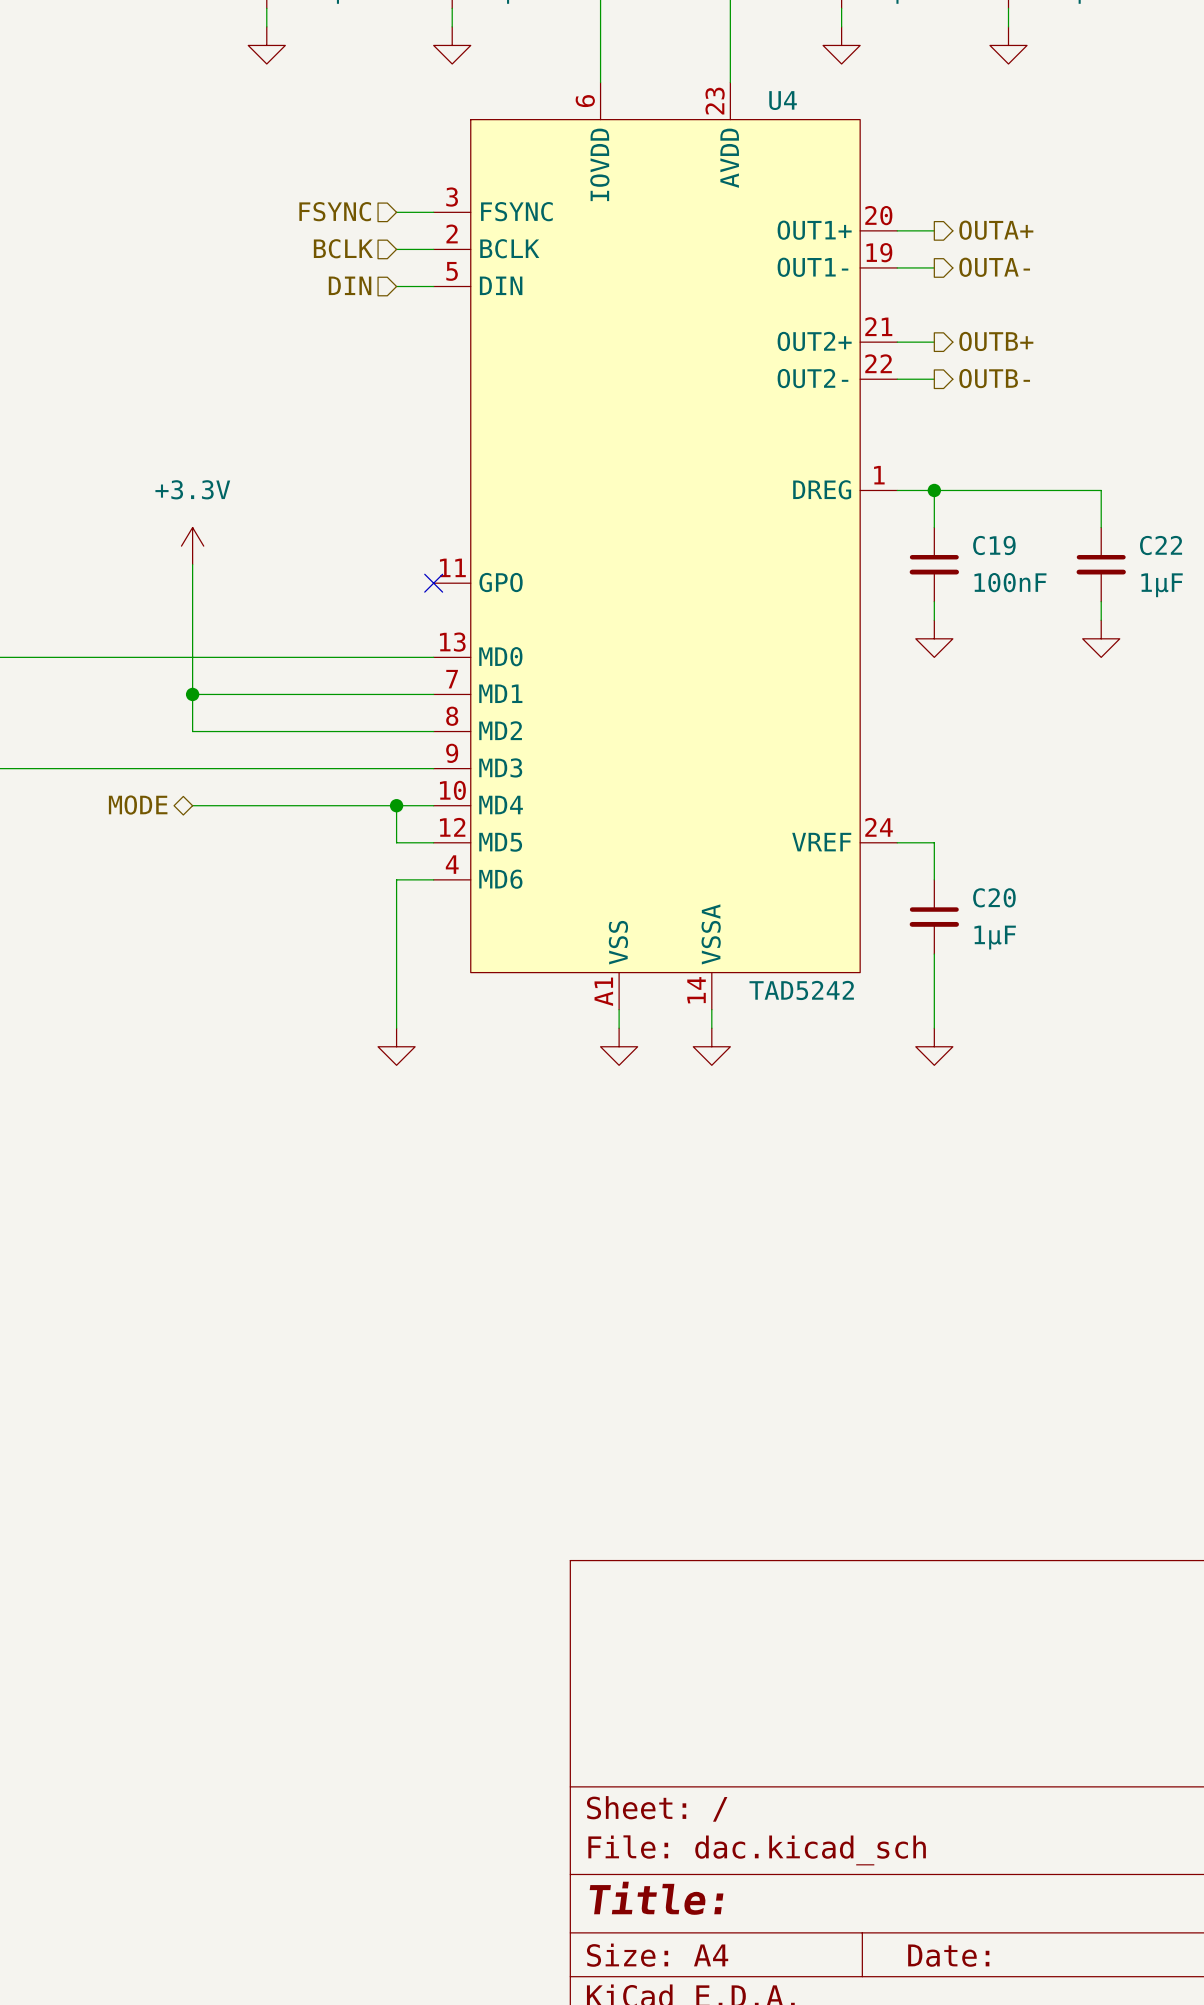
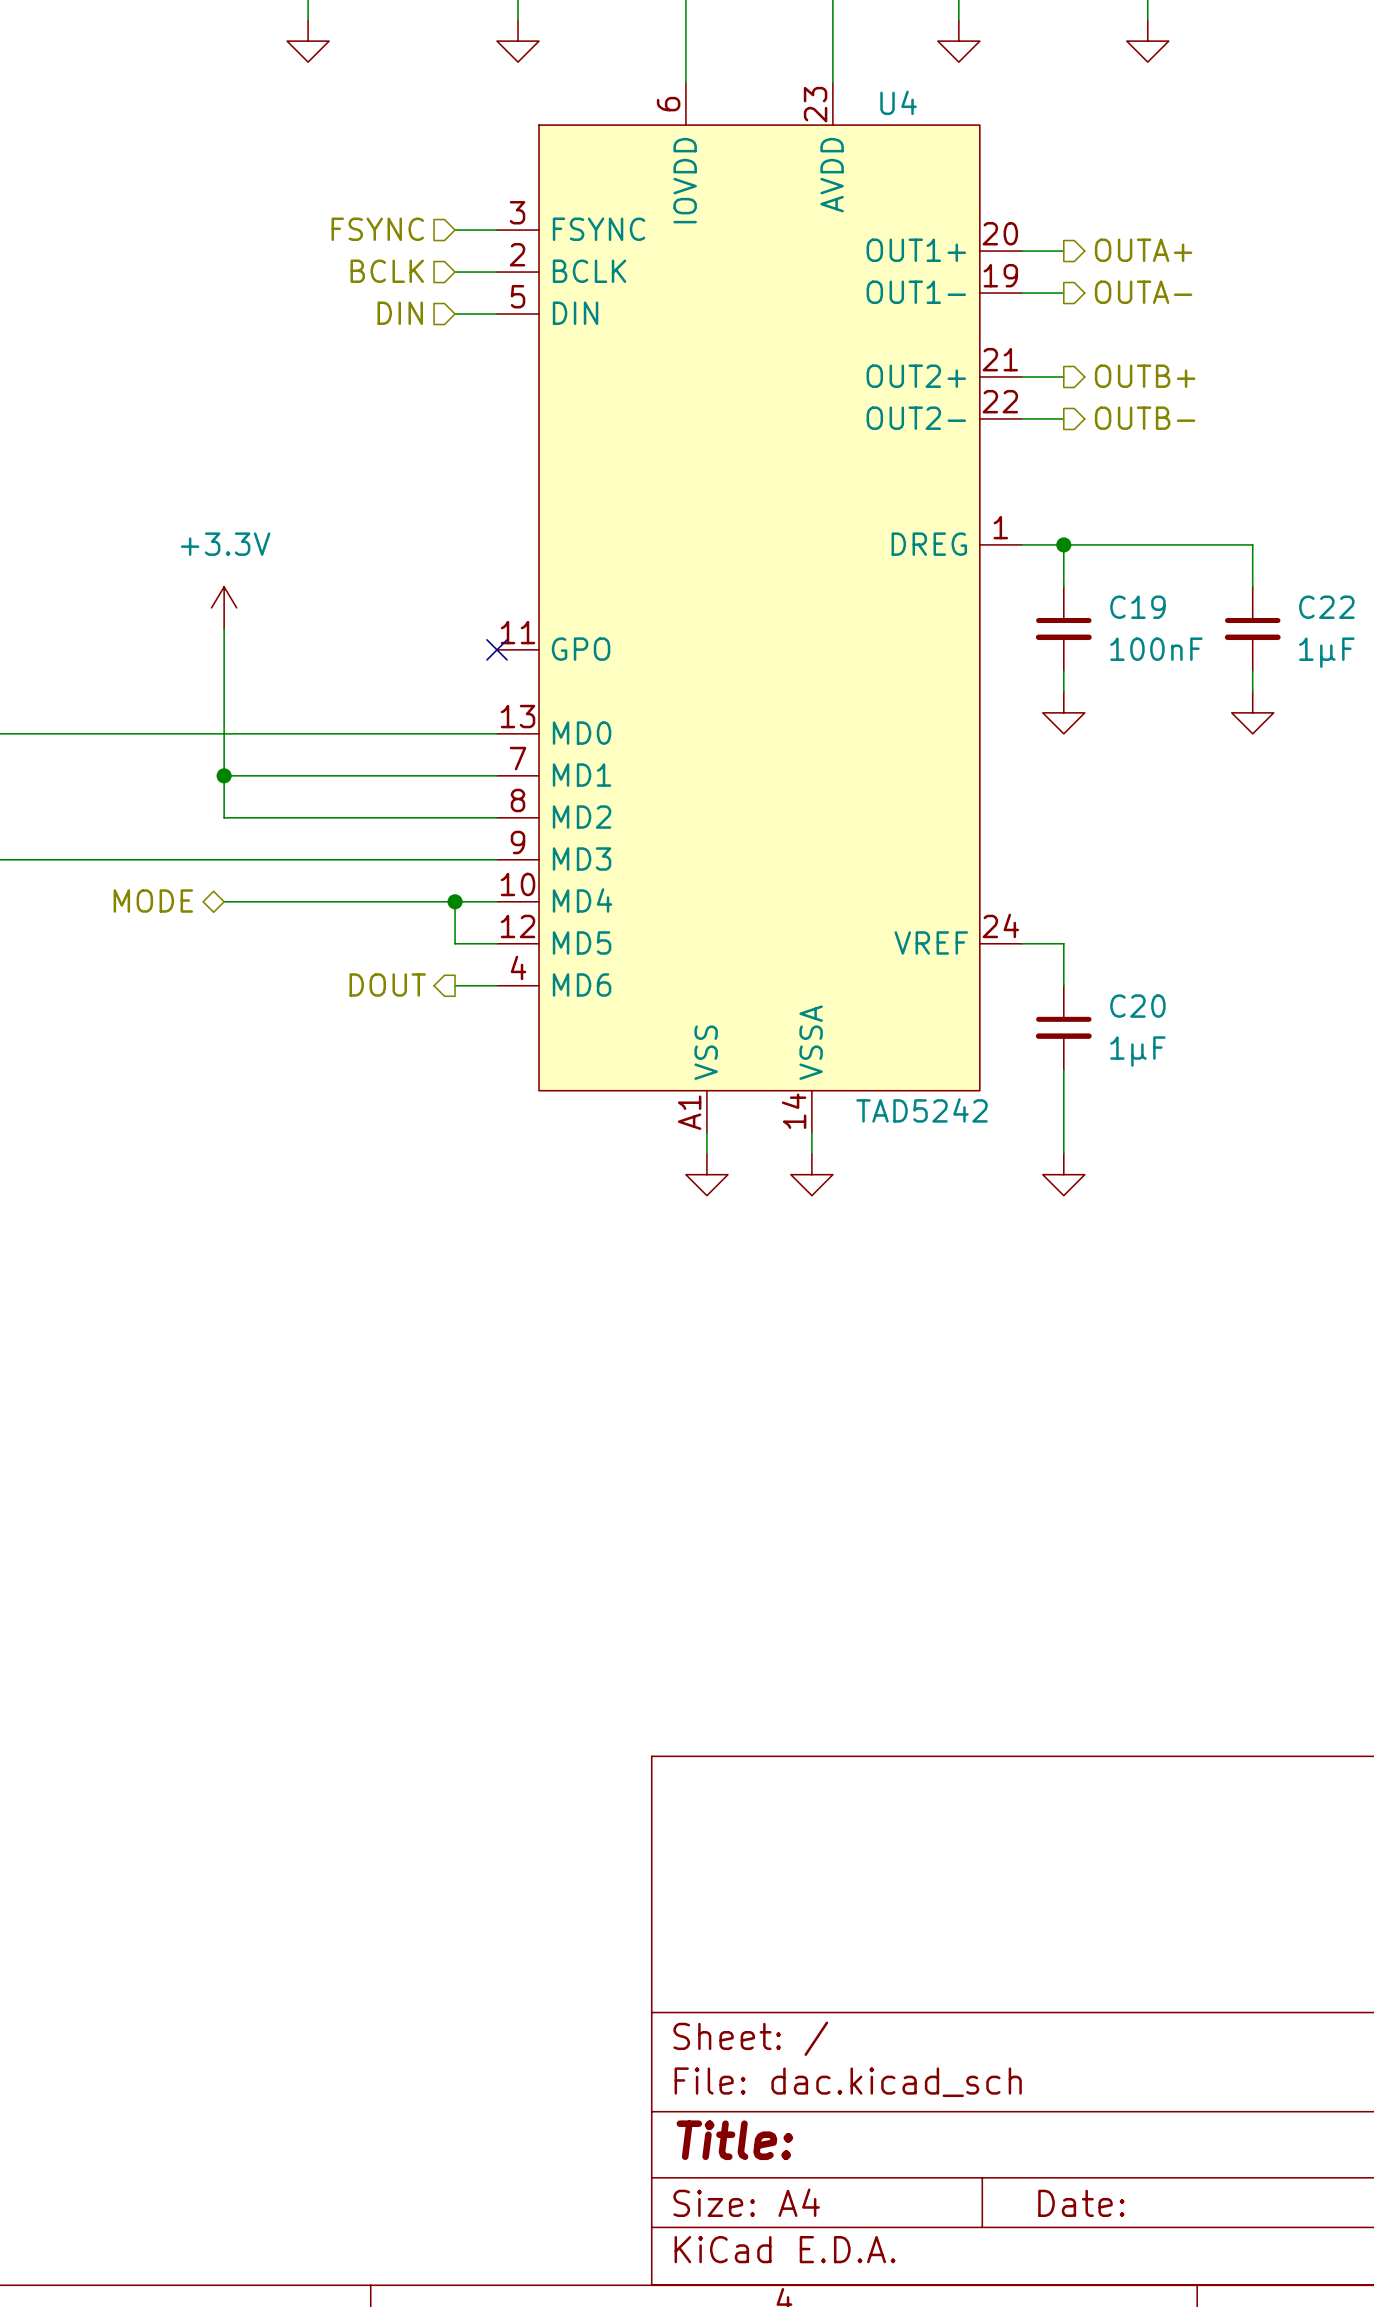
hierarchical label: none -> DOUT (387, 984)
wire: (396, 879) (396, 1028) -> none
power symbol: (396, 1046) -> none

